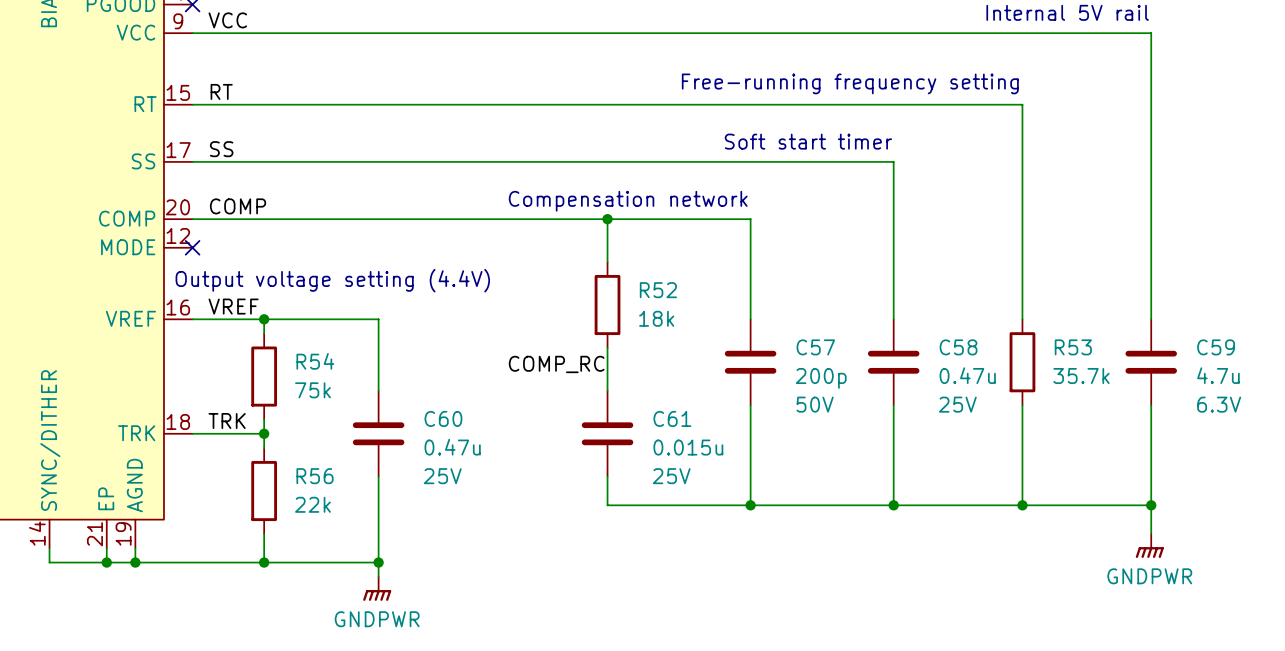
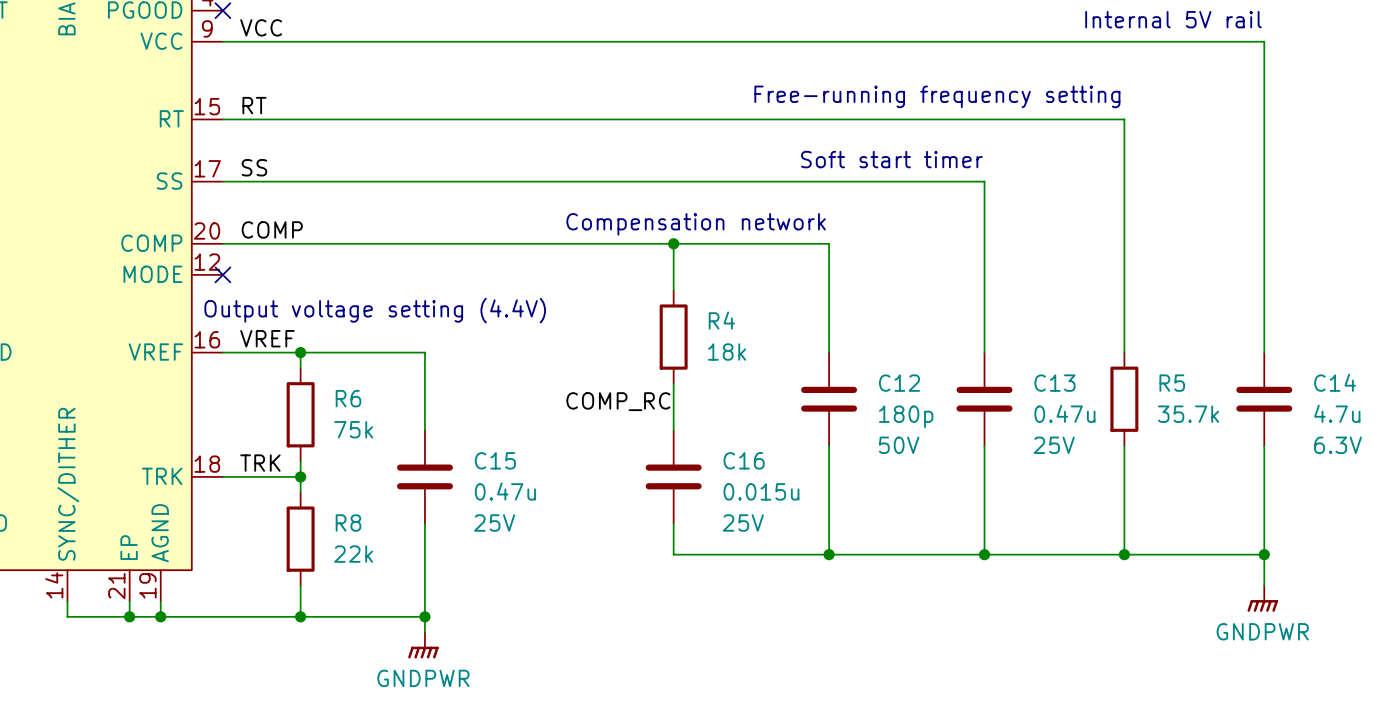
R52 name: R52 (658, 290) -> R4 (721, 320)
C57 name: C57 (815, 347) -> C12 (899, 383)
C58 name: C58 (958, 347) -> C13 (1054, 383)
R53 name: R53 (1073, 347) -> R5 (1172, 383)
C59 name: C59 (1216, 347) -> C14 (1335, 382)
R54 name: R54 (315, 361) -> R6 (348, 398)
C57 value: 200p (821, 378) -> 180p (906, 416)
C60 name: C60 (443, 418) -> C15 (495, 460)
C61 name: C61 (672, 418) -> C16 (744, 460)
R56 name: R56 (315, 476) -> R8 (348, 522)

